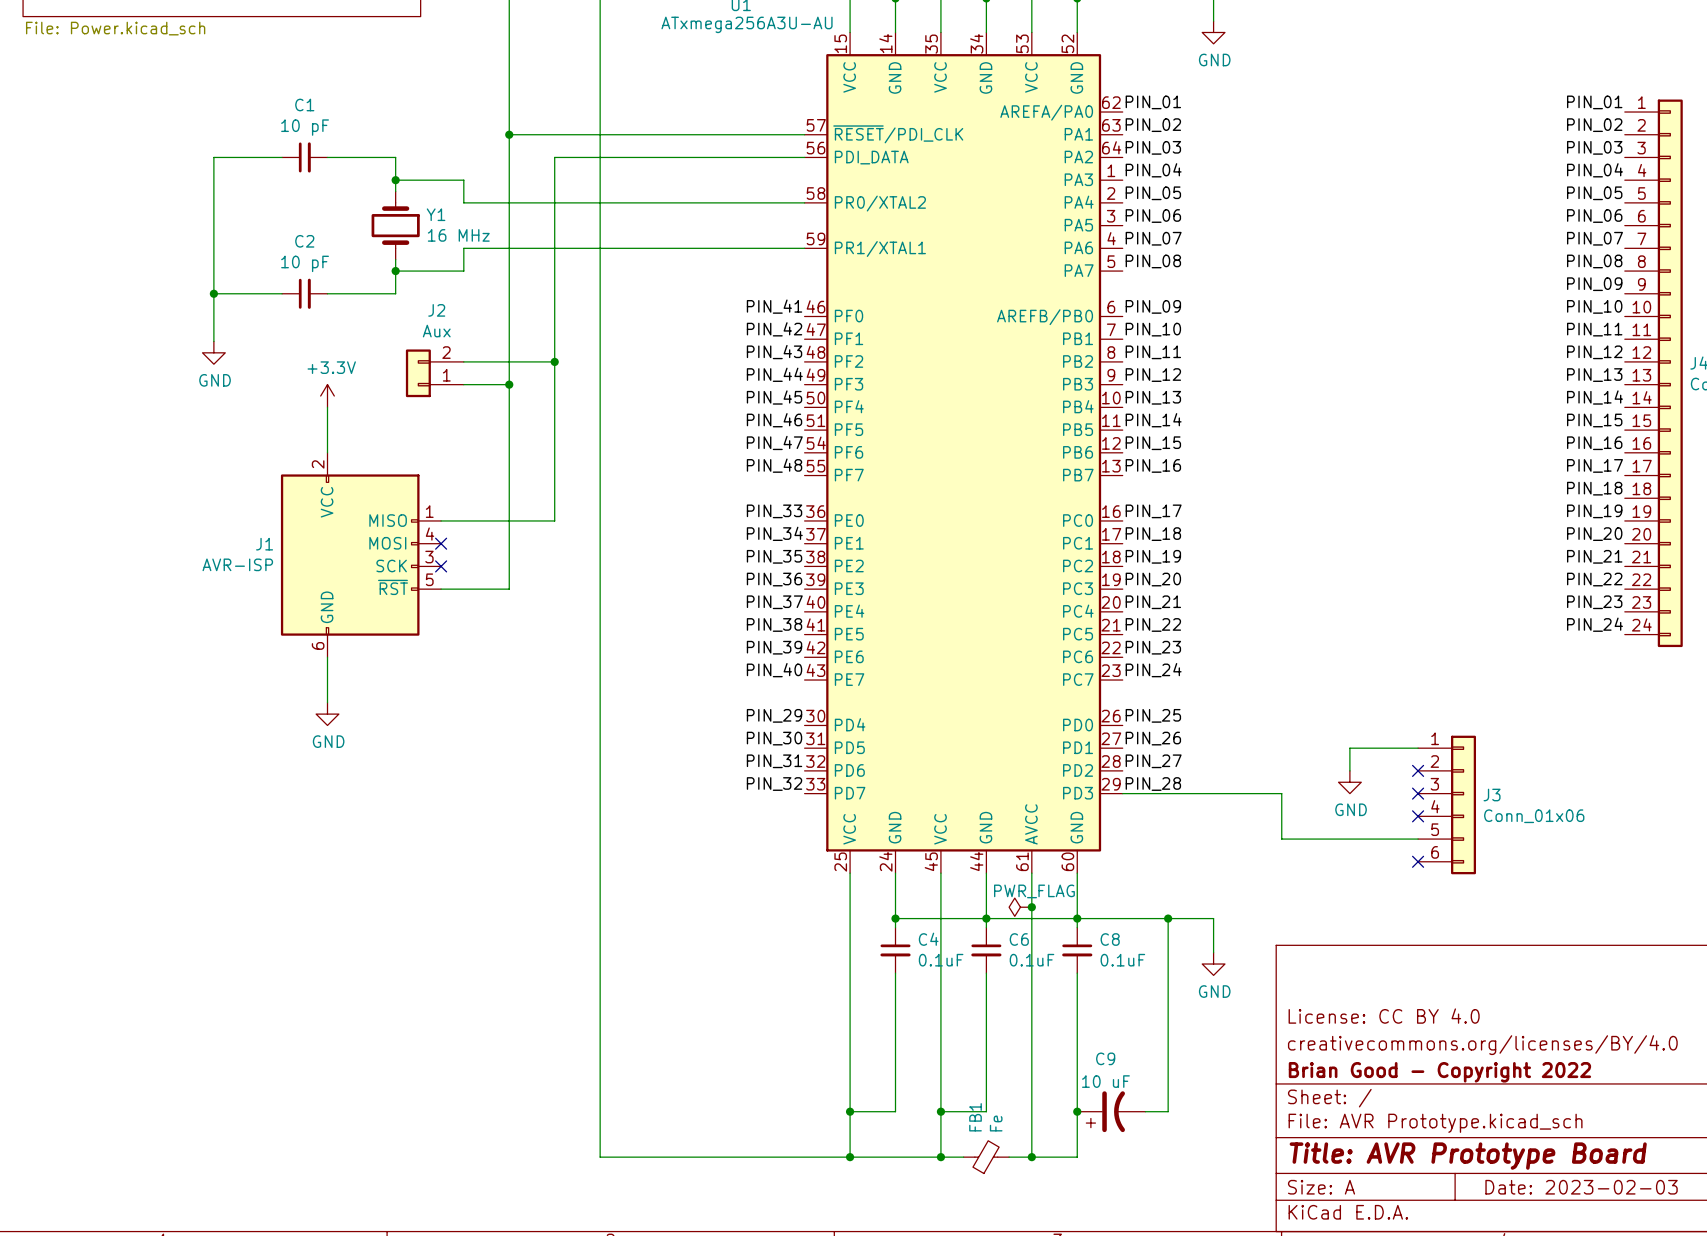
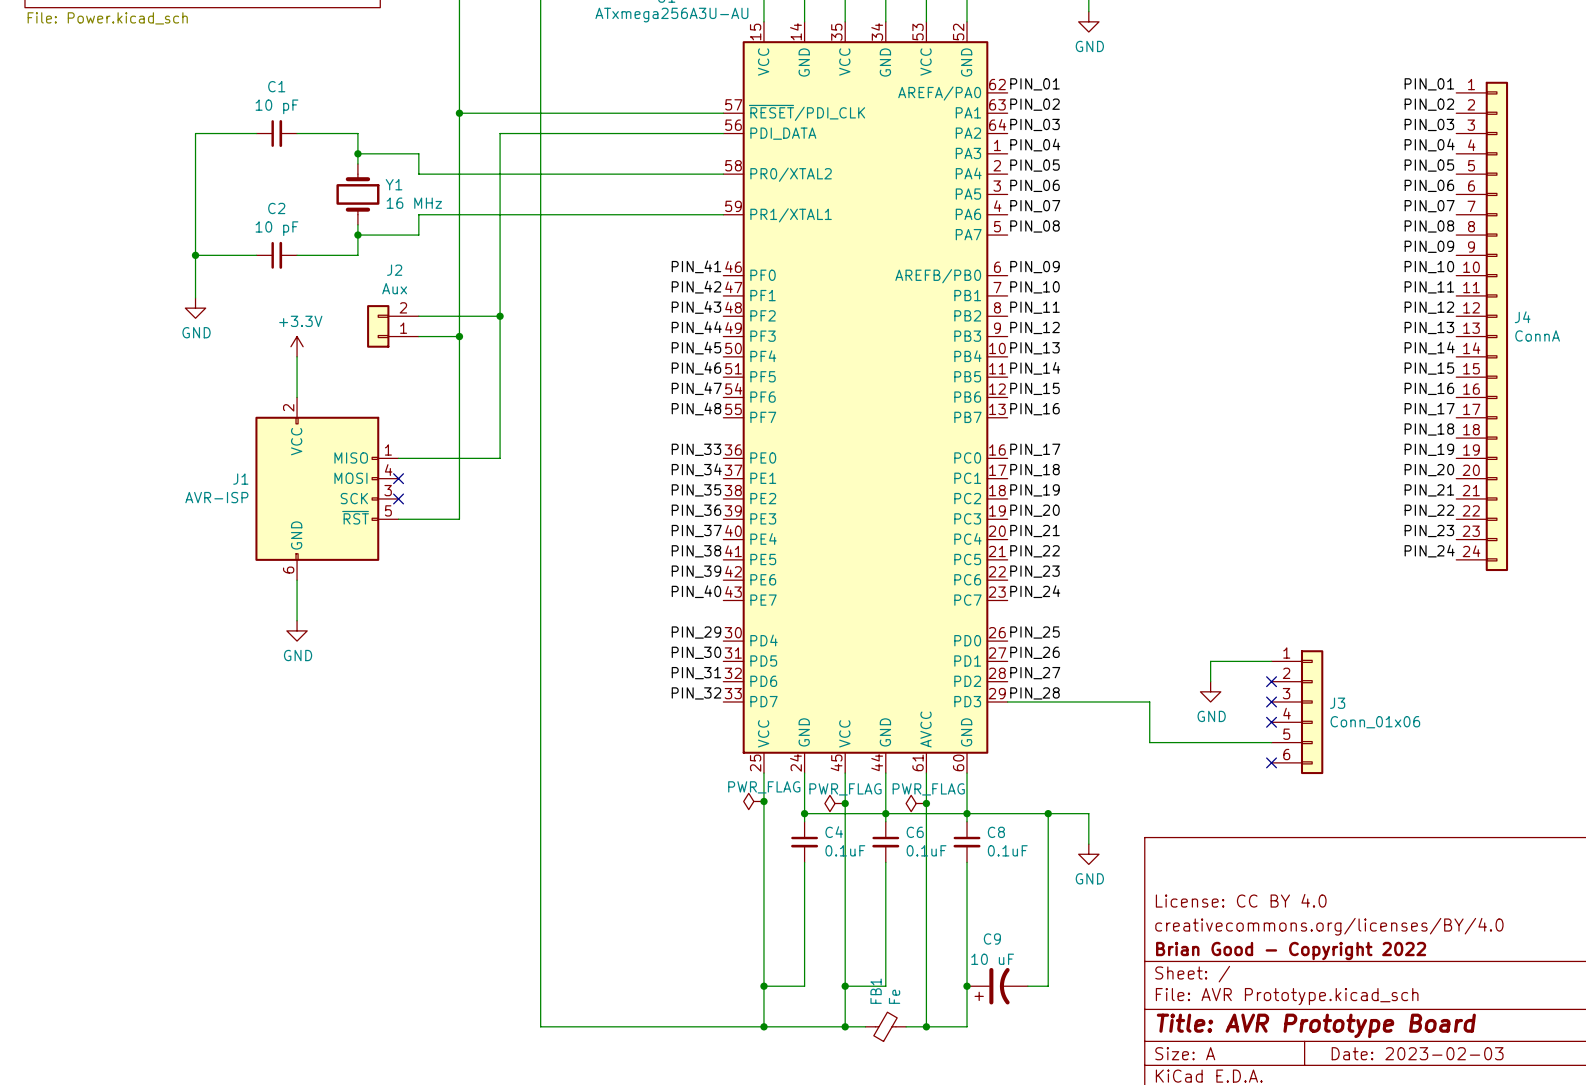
power symbol: none -> PWR_FLAG (753, 801)
junction: none -> (763, 801)
power symbol: none -> PWR_FLAG (835, 803)
junction: none -> (845, 803)

